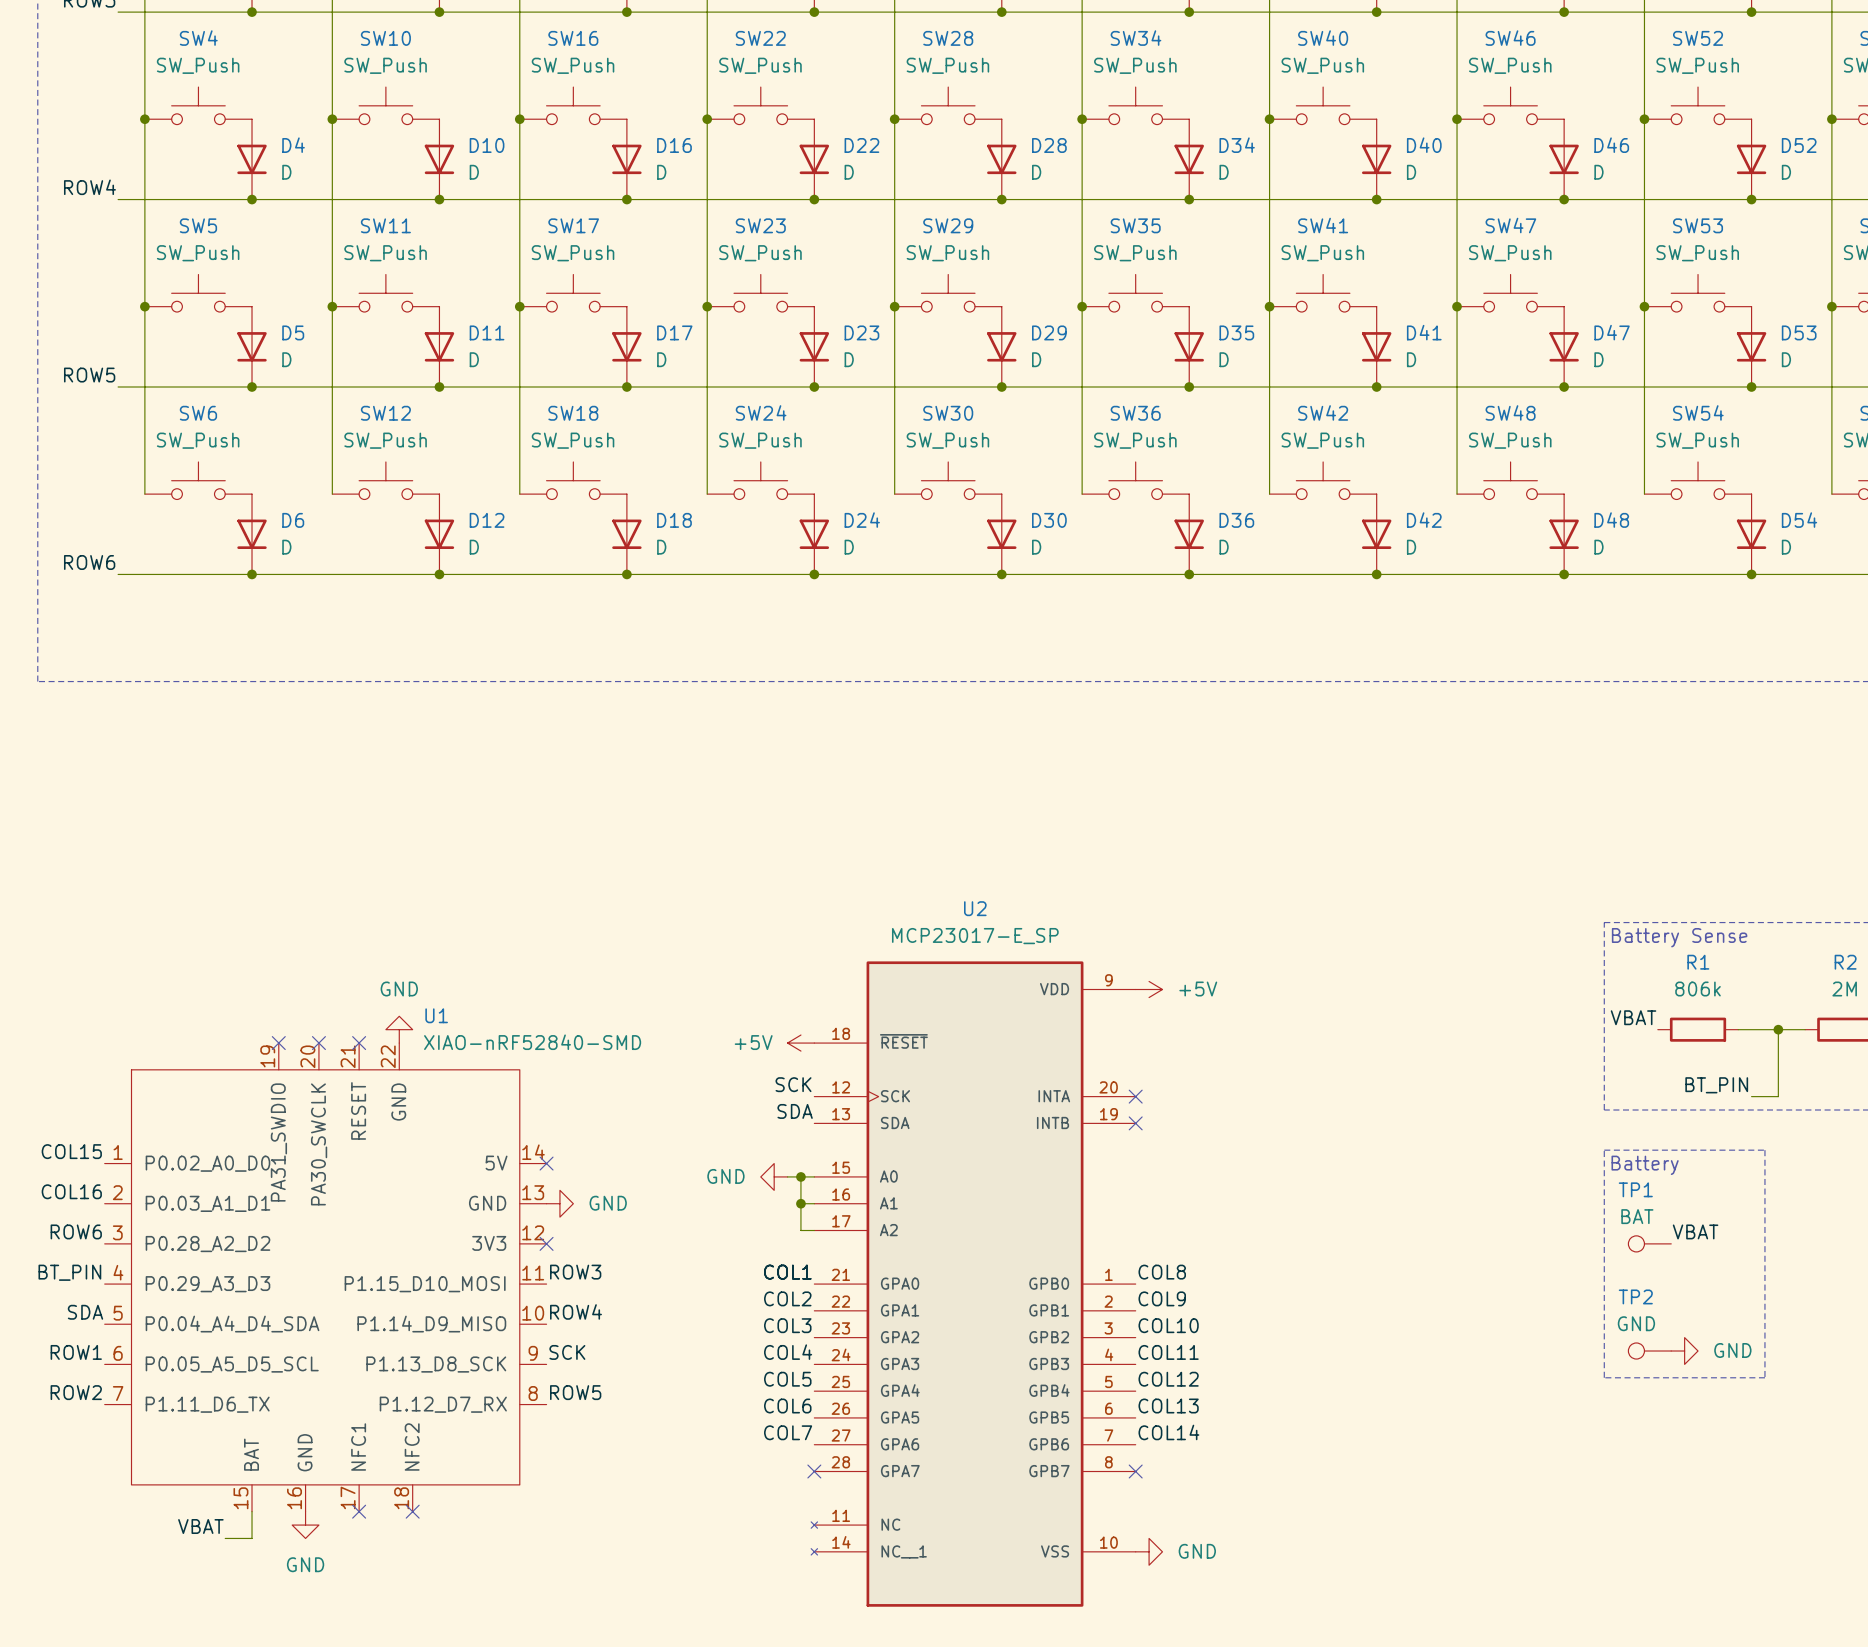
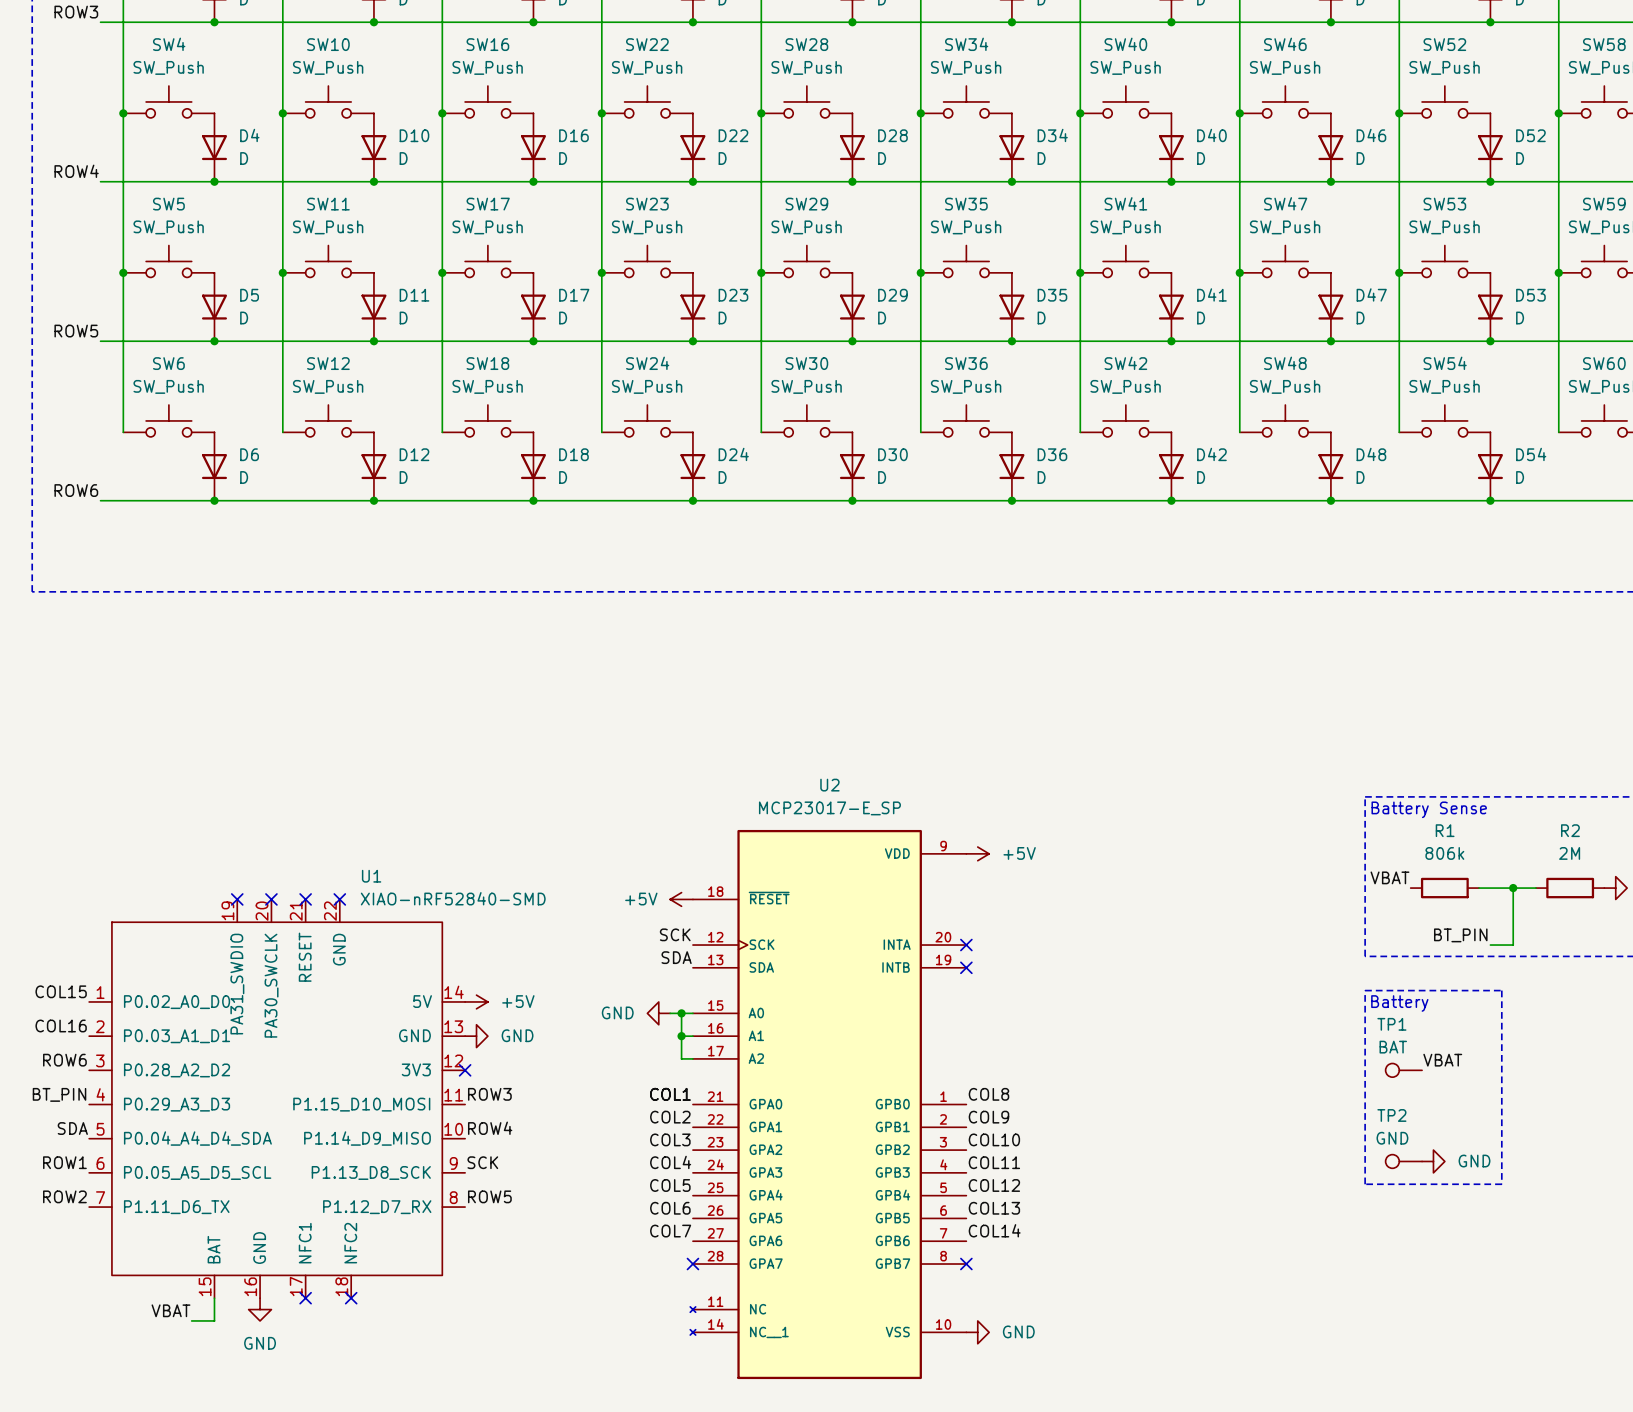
power symbol: GND (399, 1029) -> none
no-connect mark: none -> (339, 899)
no-connect mark: (546, 1163) -> none
power symbol: none -> +5V (476, 1001)

